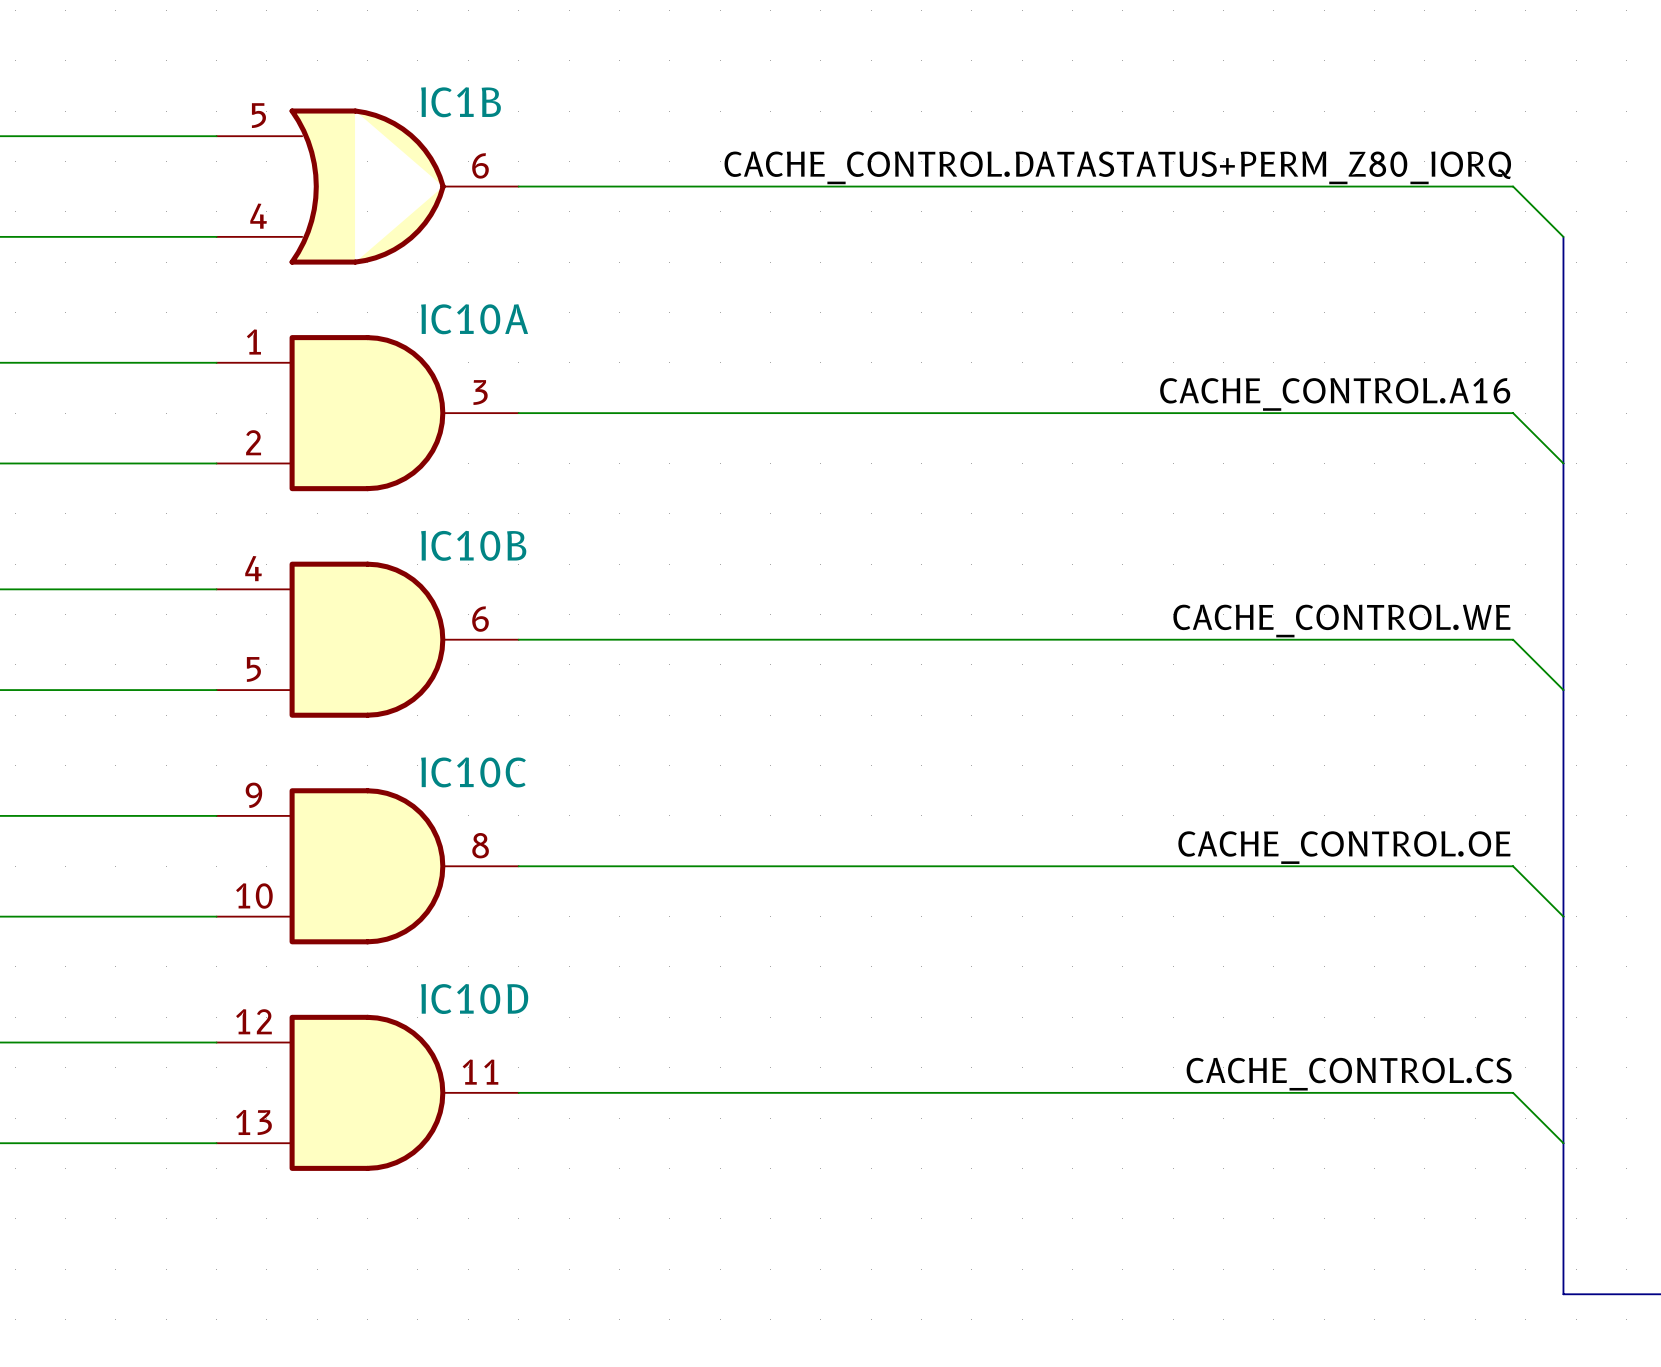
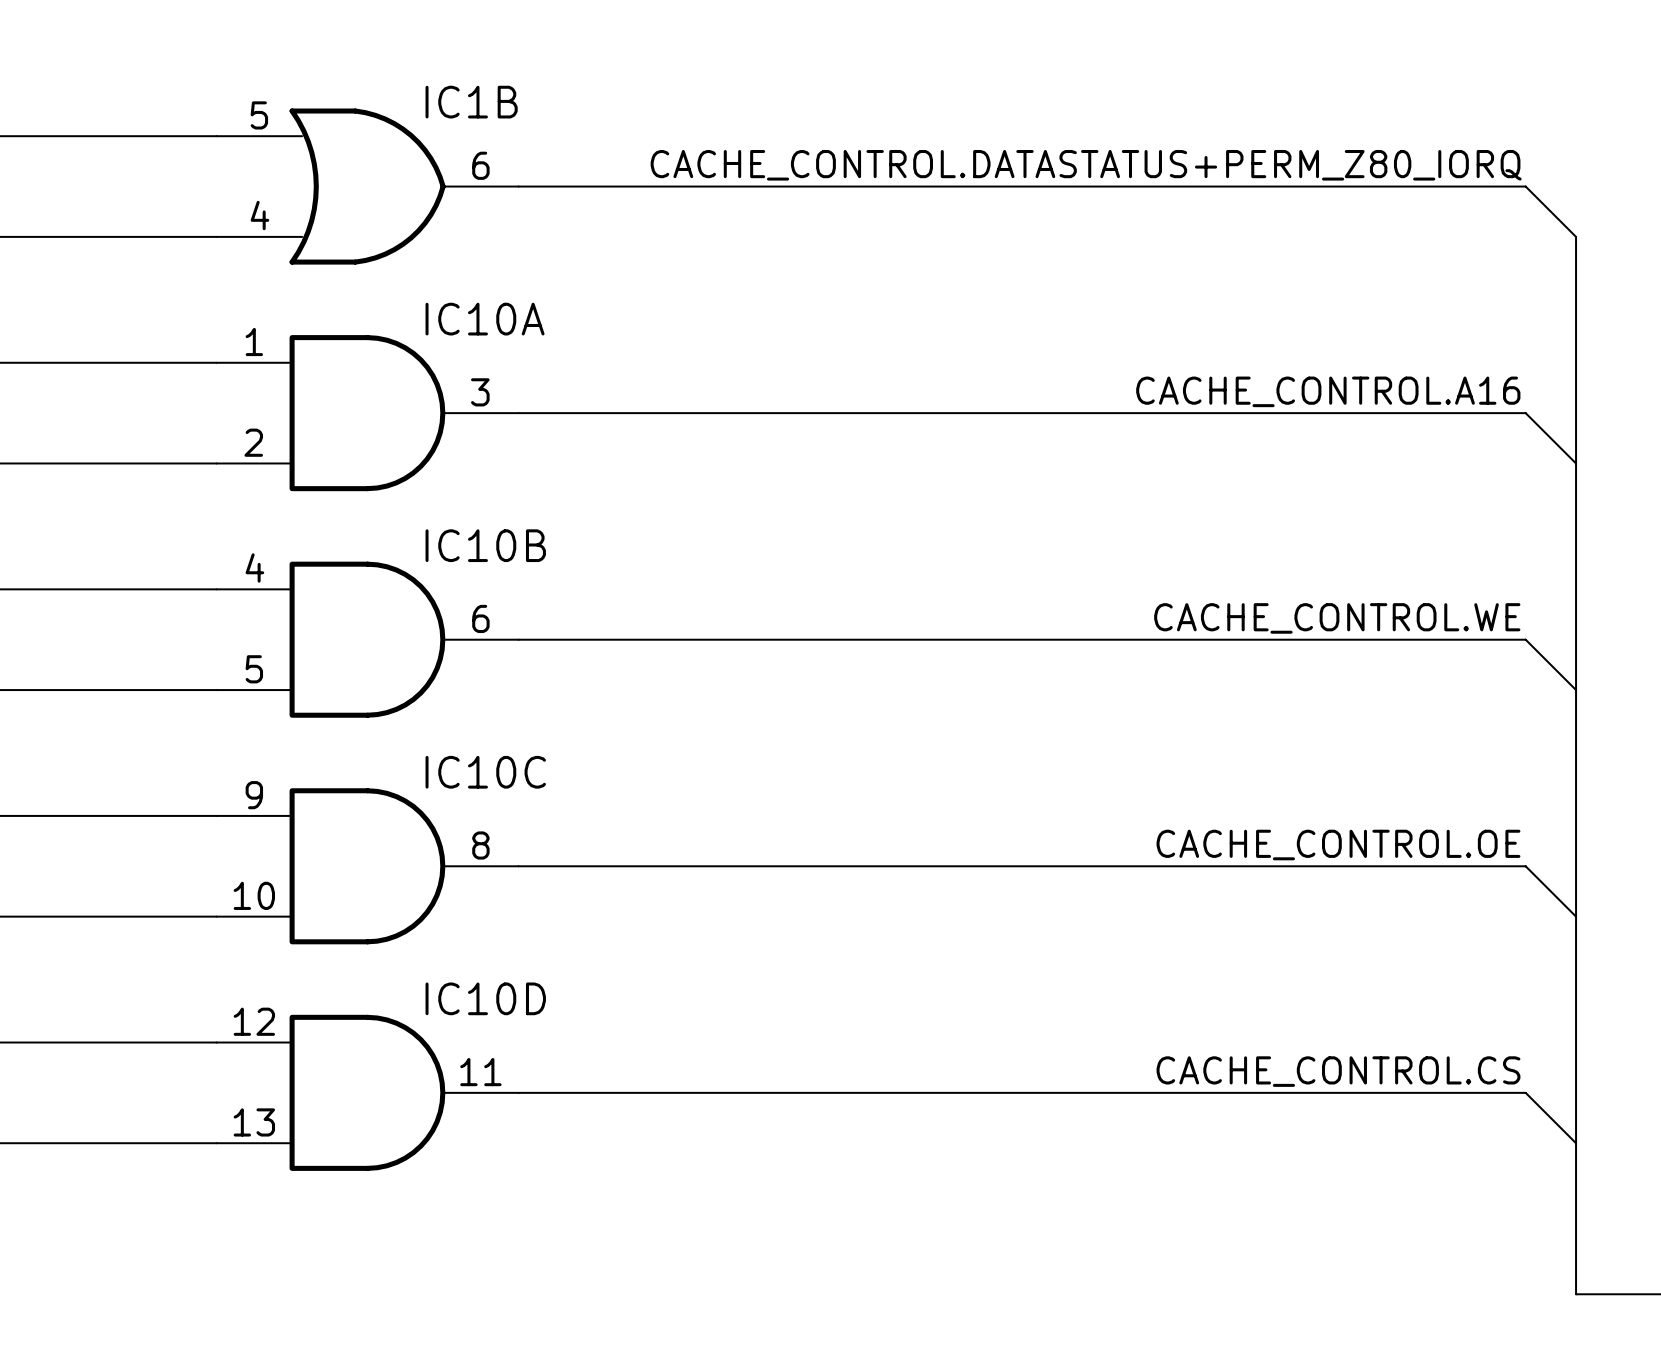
label position: CACHE_CONTROL.DATASTATUS+PERM_Z80_IORQ (1117, 167) -> CACHE_CONTROL.DATASTATUS+PERM_Z80_IORQ (1086, 165)
wire: (1513, 186) (1563, 236) -> (1513, 186) (1525, 186) (1576, 236)
bus: (1563, 236) (1563, 1294) (1576, 1294) -> (1576, 236) (1576, 1294)
label position: CACHE_CONTROL.A16 (1335, 394) -> CACHE_CONTROL.A16 (1328, 391)
wire: (1513, 413) (1563, 463) -> (1513, 413) (1525, 413) (1576, 463)
label position: CACHE_CONTROL.WE (1341, 621) -> CACHE_CONTROL.WE (1337, 618)
wire: (1513, 639) (1563, 690) -> (1513, 639) (1525, 639) (1576, 690)
label position: CACHE_CONTROL.OE (1344, 847) -> CACHE_CONTROL.OE (1338, 845)
wire: (1513, 866) (1563, 916) -> (1513, 866) (1525, 866) (1576, 916)
label position: CACHE_CONTROL.CS (1349, 1074) -> CACHE_CONTROL.CS (1338, 1071)
wire: (1513, 1092) (1563, 1143) -> (1513, 1092) (1525, 1092) (1576, 1143)

